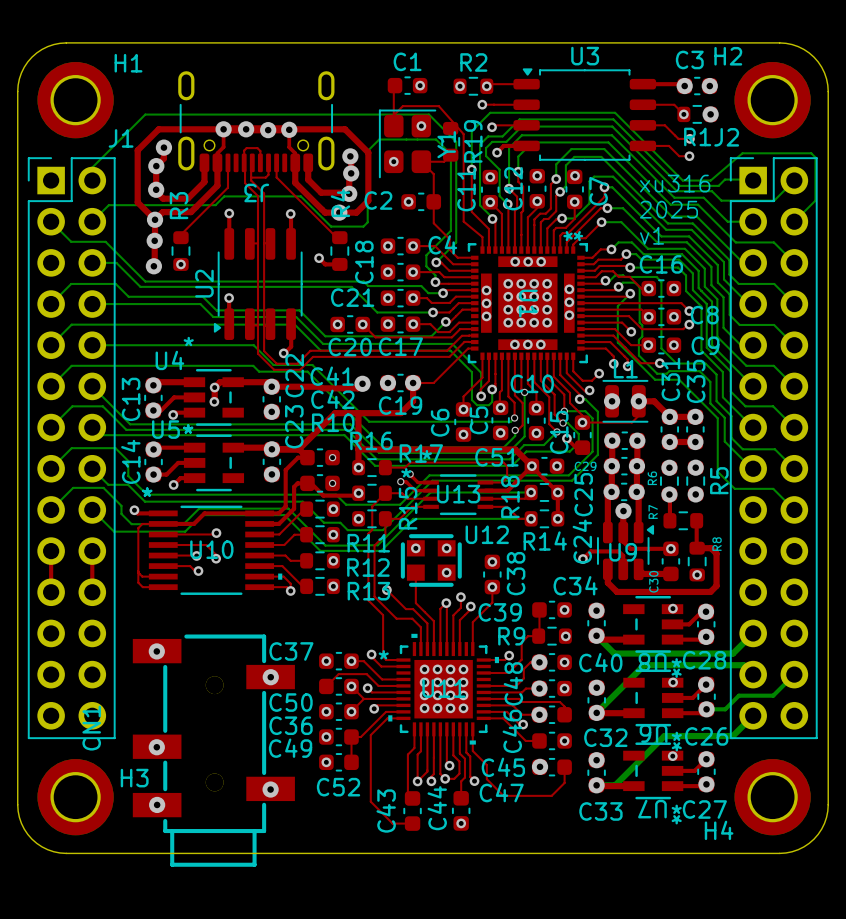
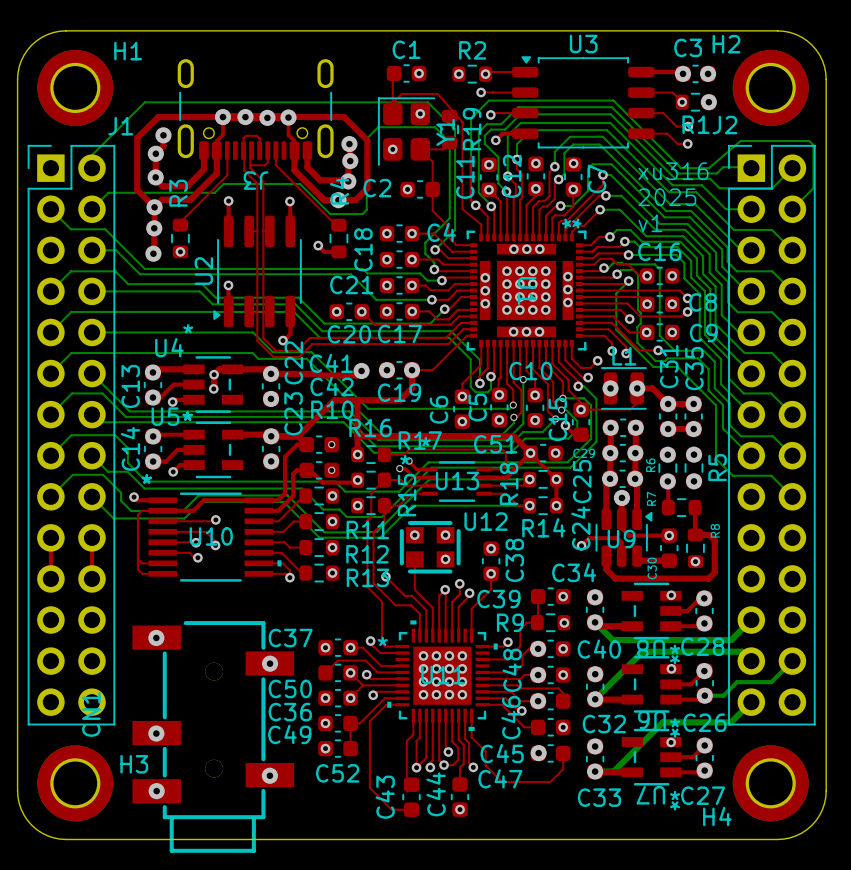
bottom track: (472, 130) (471, 169) -> (471, 118) (471, 200) (475, 205)
via position: (471, 169) -> (475, 205)

